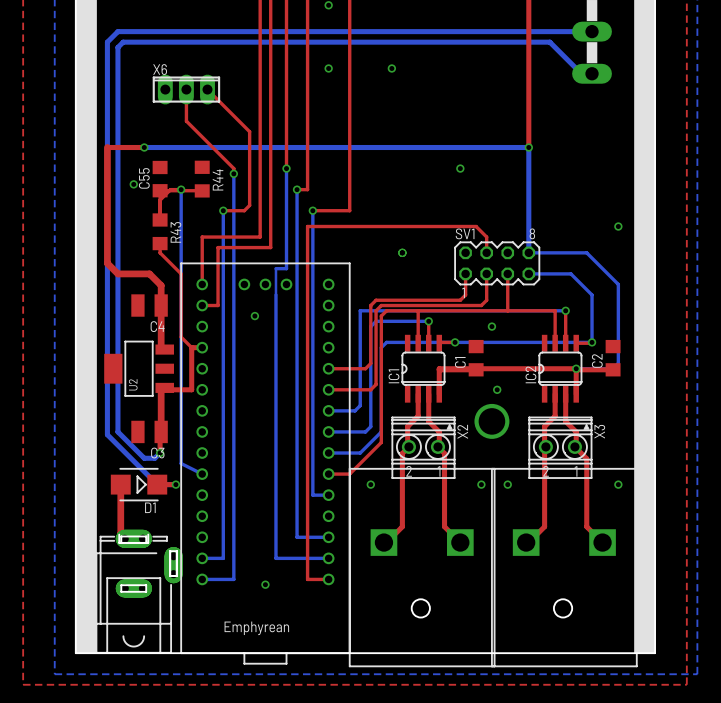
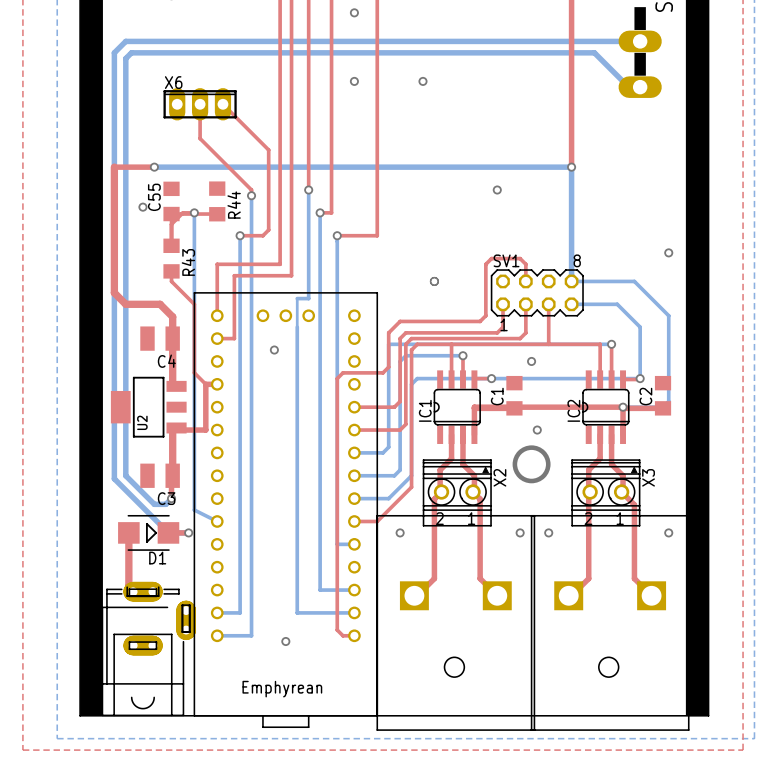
top track: (481, 231) (476, 226) (307, 226) (307, 579) (318, 579) -> (520, 258) (491, 258) (485, 264) (485, 315) (480, 321) (400, 321) (388, 332) (388, 367) (382, 372) (342, 372) (337, 378) (337, 630) (342, 635)

